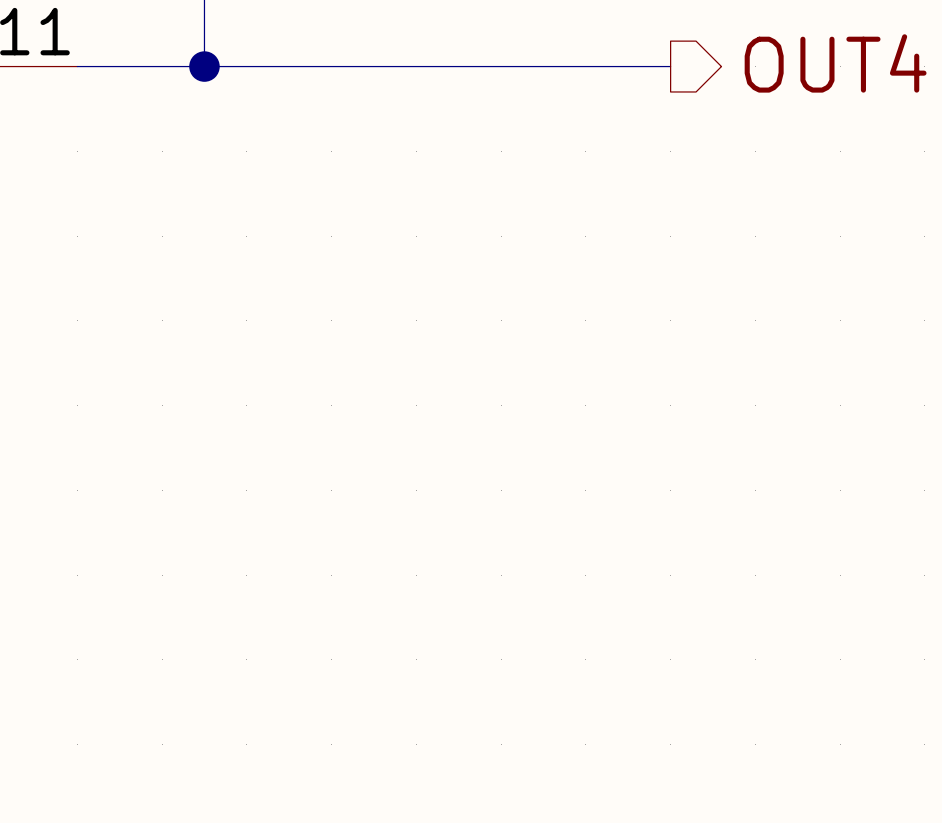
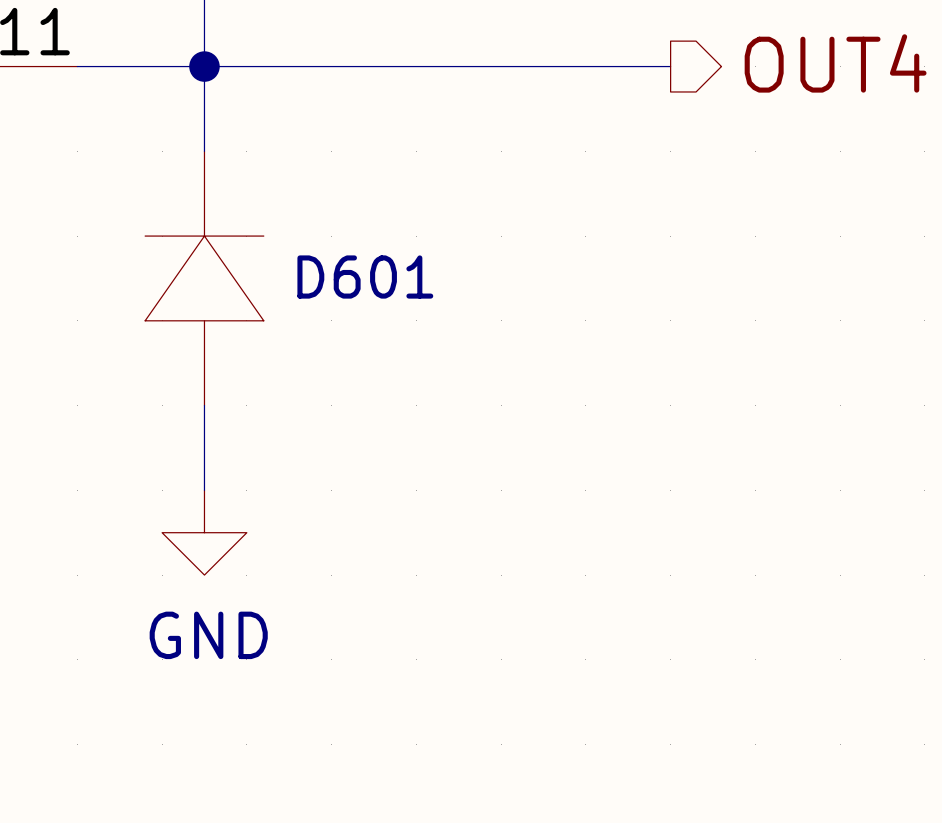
wire: none -> (204, 66) (204, 151)
D601: none -> (204, 278)
wire: none -> (204, 405) (204, 490)
power symbol: none -> GND (204, 532)

